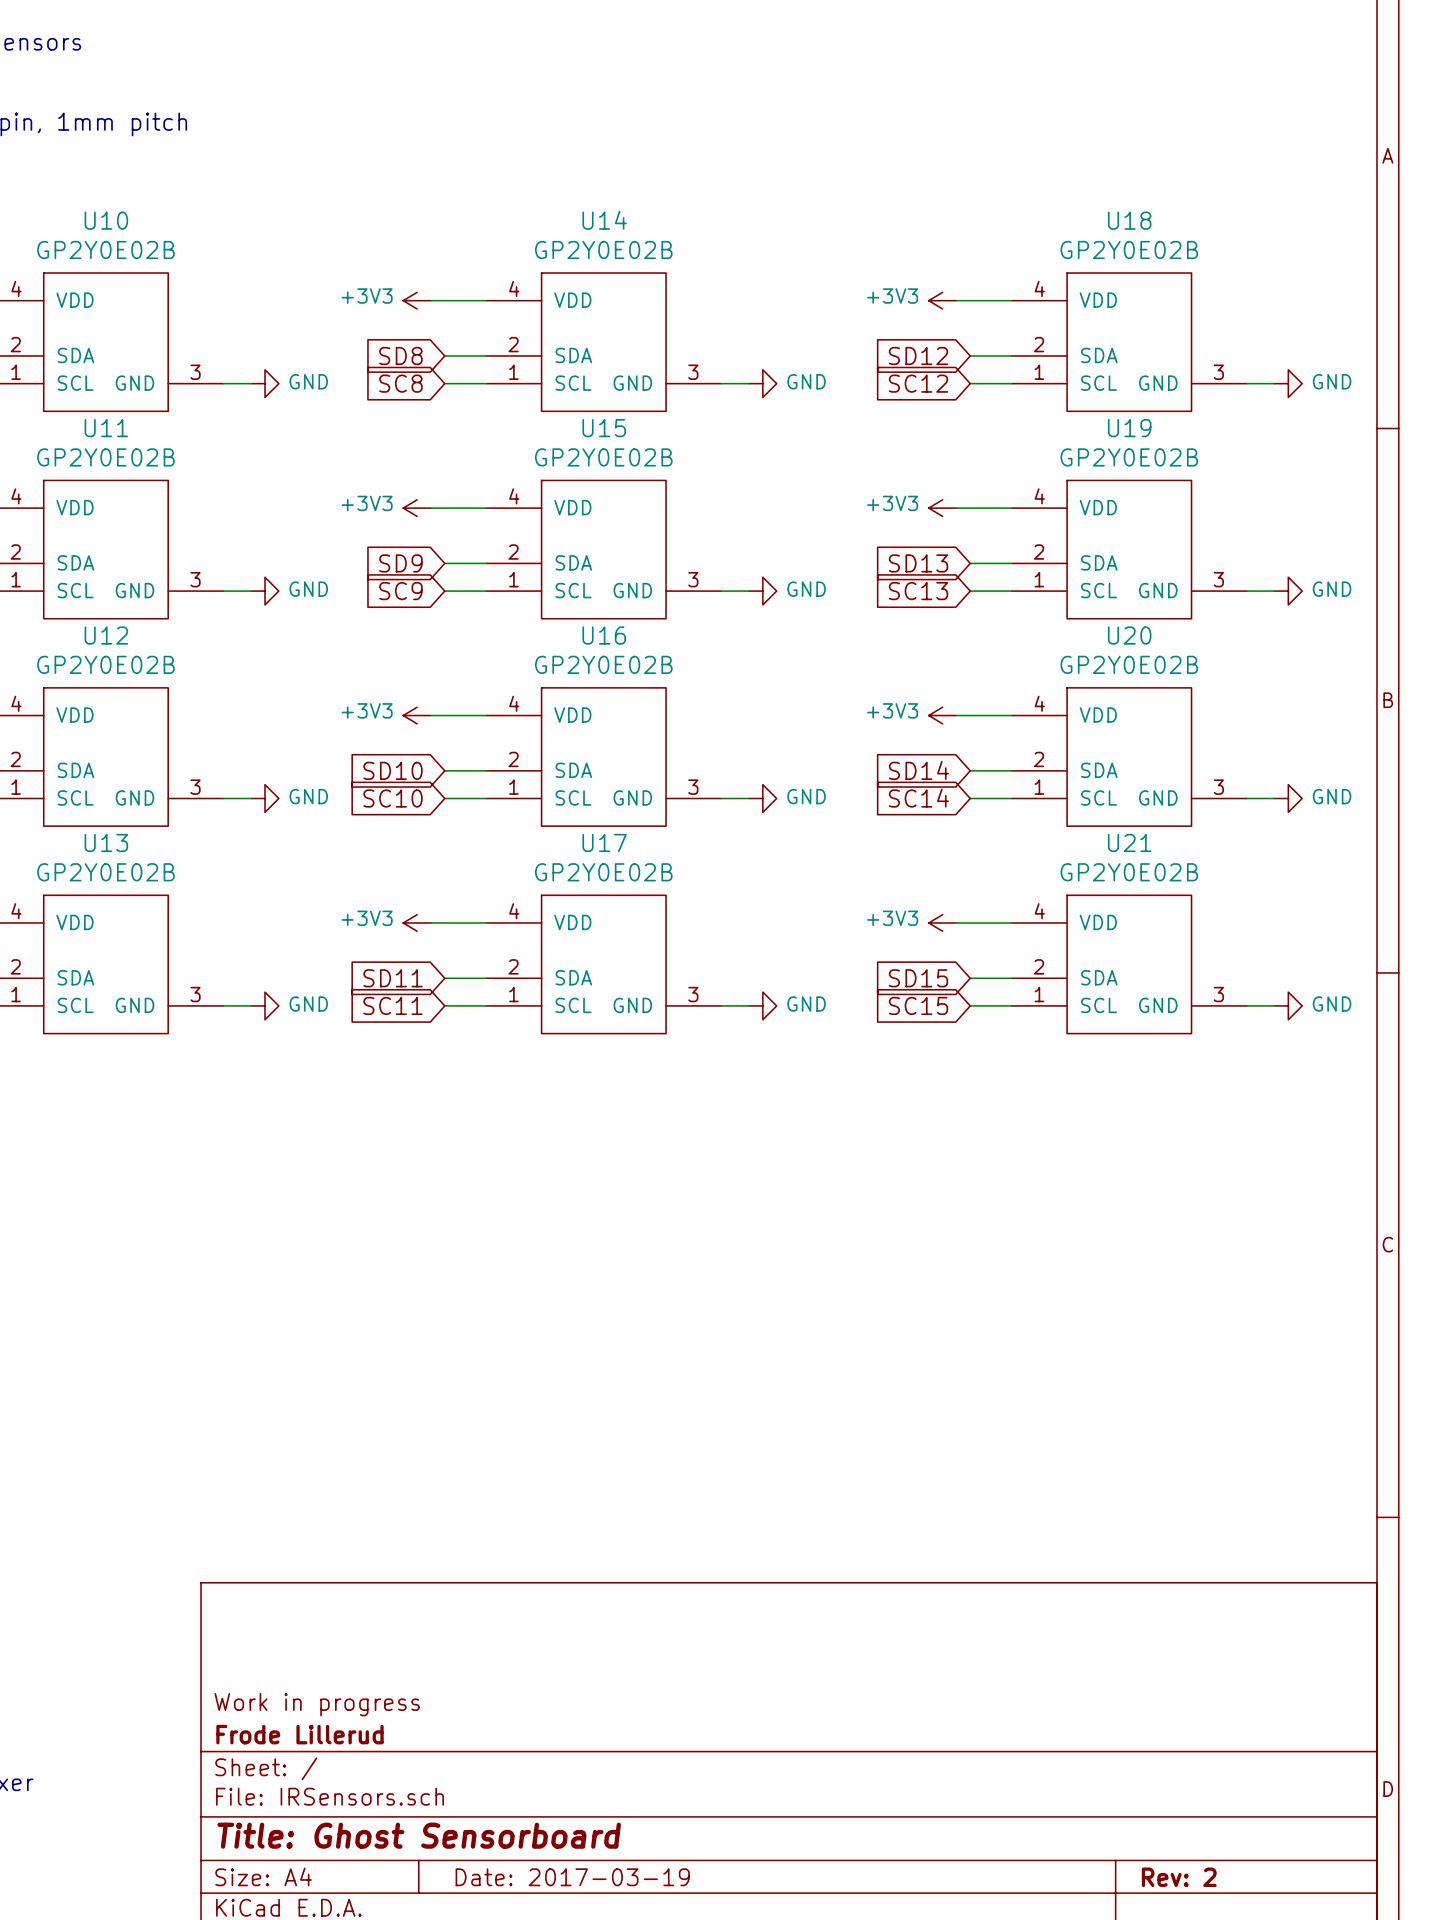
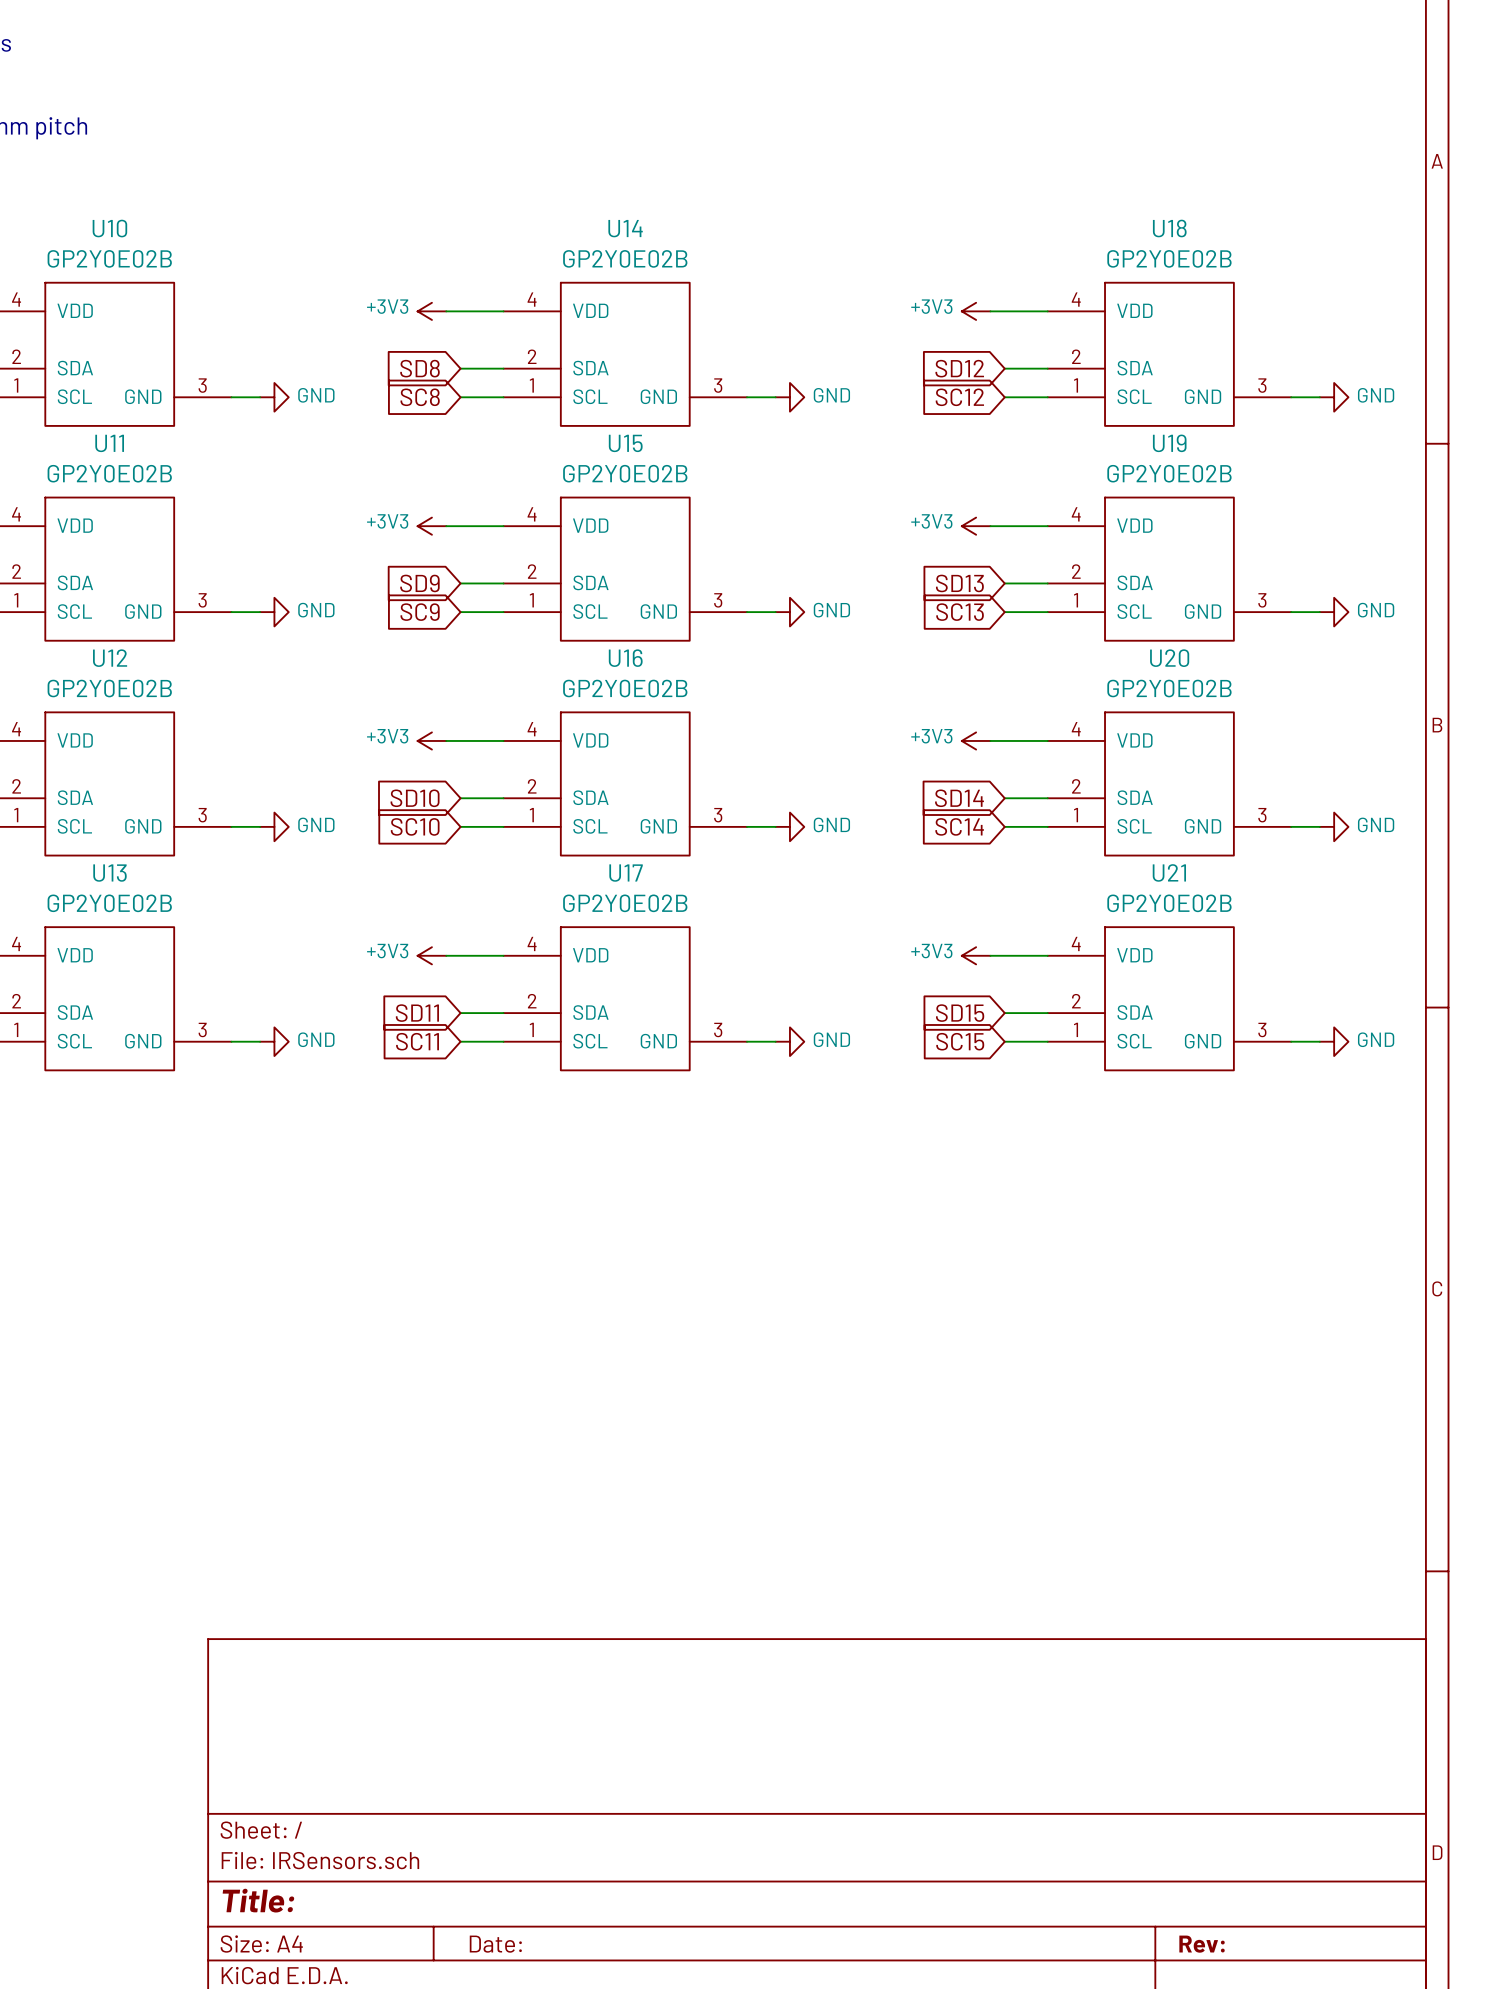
title block: Work in progress (317, 1704) -> none
title block: Frode Lillerud (299, 1734) -> none
title block: Title: Ghost Sensorboard (419, 1835) -> Title: (258, 1900)
title block: Date: 2017-03-19 (572, 1877) -> Date: (495, 1944)
title block: Rev: 2 (1179, 1877) -> Rev: (1202, 1944)

